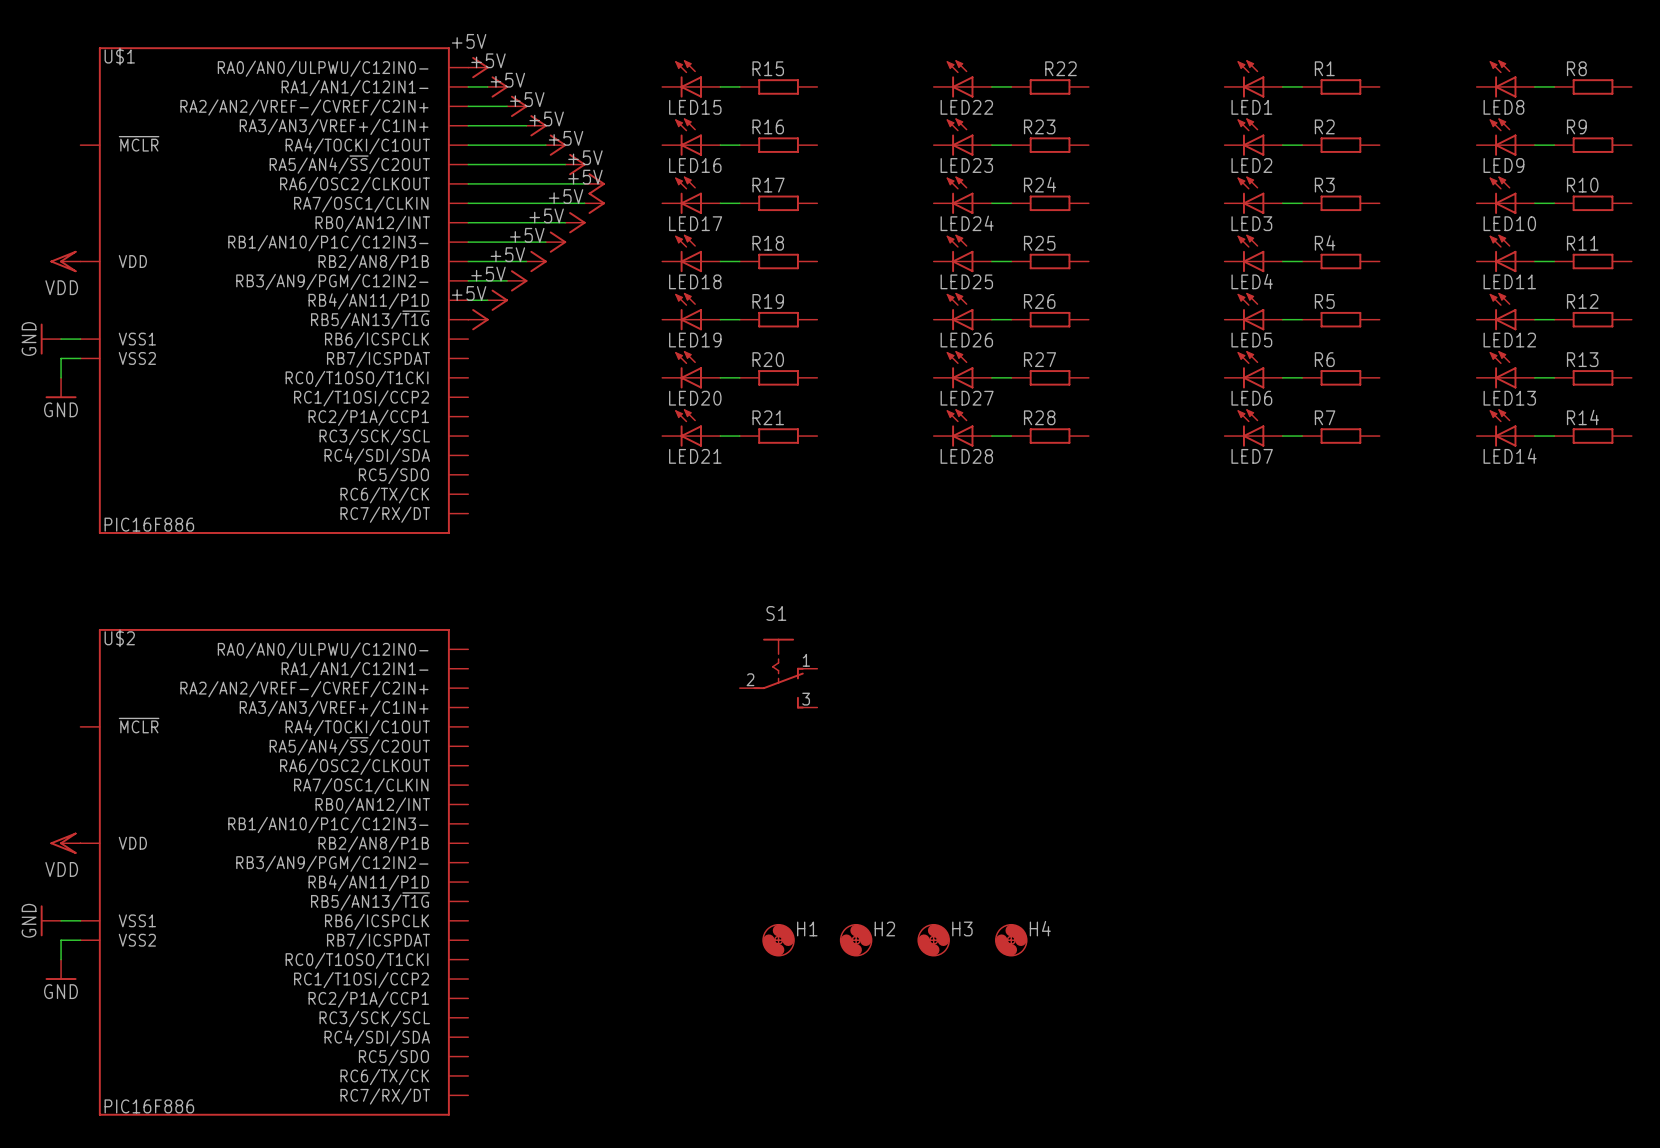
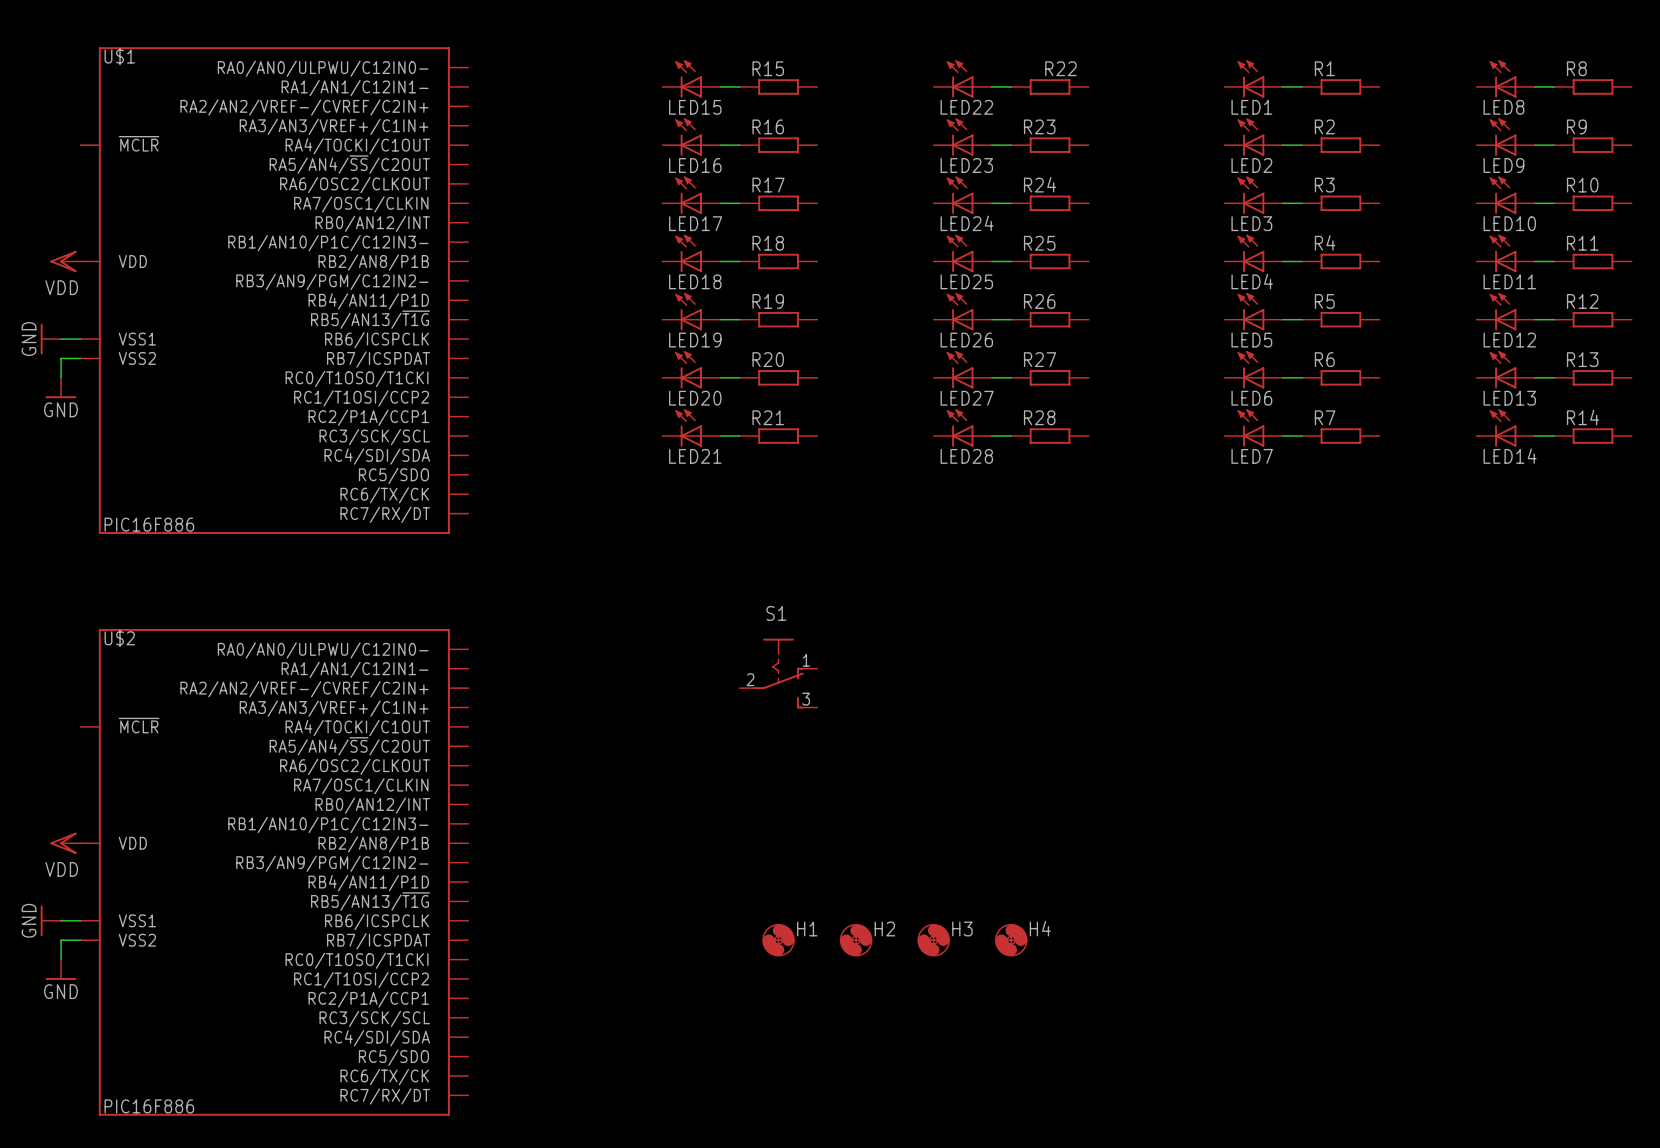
power symbol: +5V (478, 67) -> none
wire: (468, 86) (487, 86) -> none
power symbol: +5V (497, 86) -> none
wire: (468, 106) (507, 106) -> none
power symbol: +5V (517, 106) -> none
wire: (468, 125) (526, 125) -> none
power symbol: +5V (536, 125) -> none
wire: (468, 145) (545, 145) -> none
power symbol: +5V (556, 145) -> none
wire: (468, 164) (565, 164) -> none
power symbol: +5V (575, 164) -> none
wire: (468, 183) (584, 183) -> none
power symbol: +5V (594, 183) -> none
wire: (468, 203) (584, 203) -> none
power symbol: +5V (594, 203) -> none
wire: (468, 222) (565, 222) -> none
power symbol: +5V (575, 222) -> none
wire: (468, 242) (545, 242) -> none
power symbol: +5V (556, 242) -> none
wire: (468, 261) (526, 261) -> none
power symbol: +5V (536, 261) -> none
wire: (468, 280) (507, 280) -> none
power symbol: +5V (517, 280) -> none
wire: (468, 300) (487, 300) -> none
power symbol: +5V (497, 300) -> none
power symbol: +5V (478, 319) -> none

